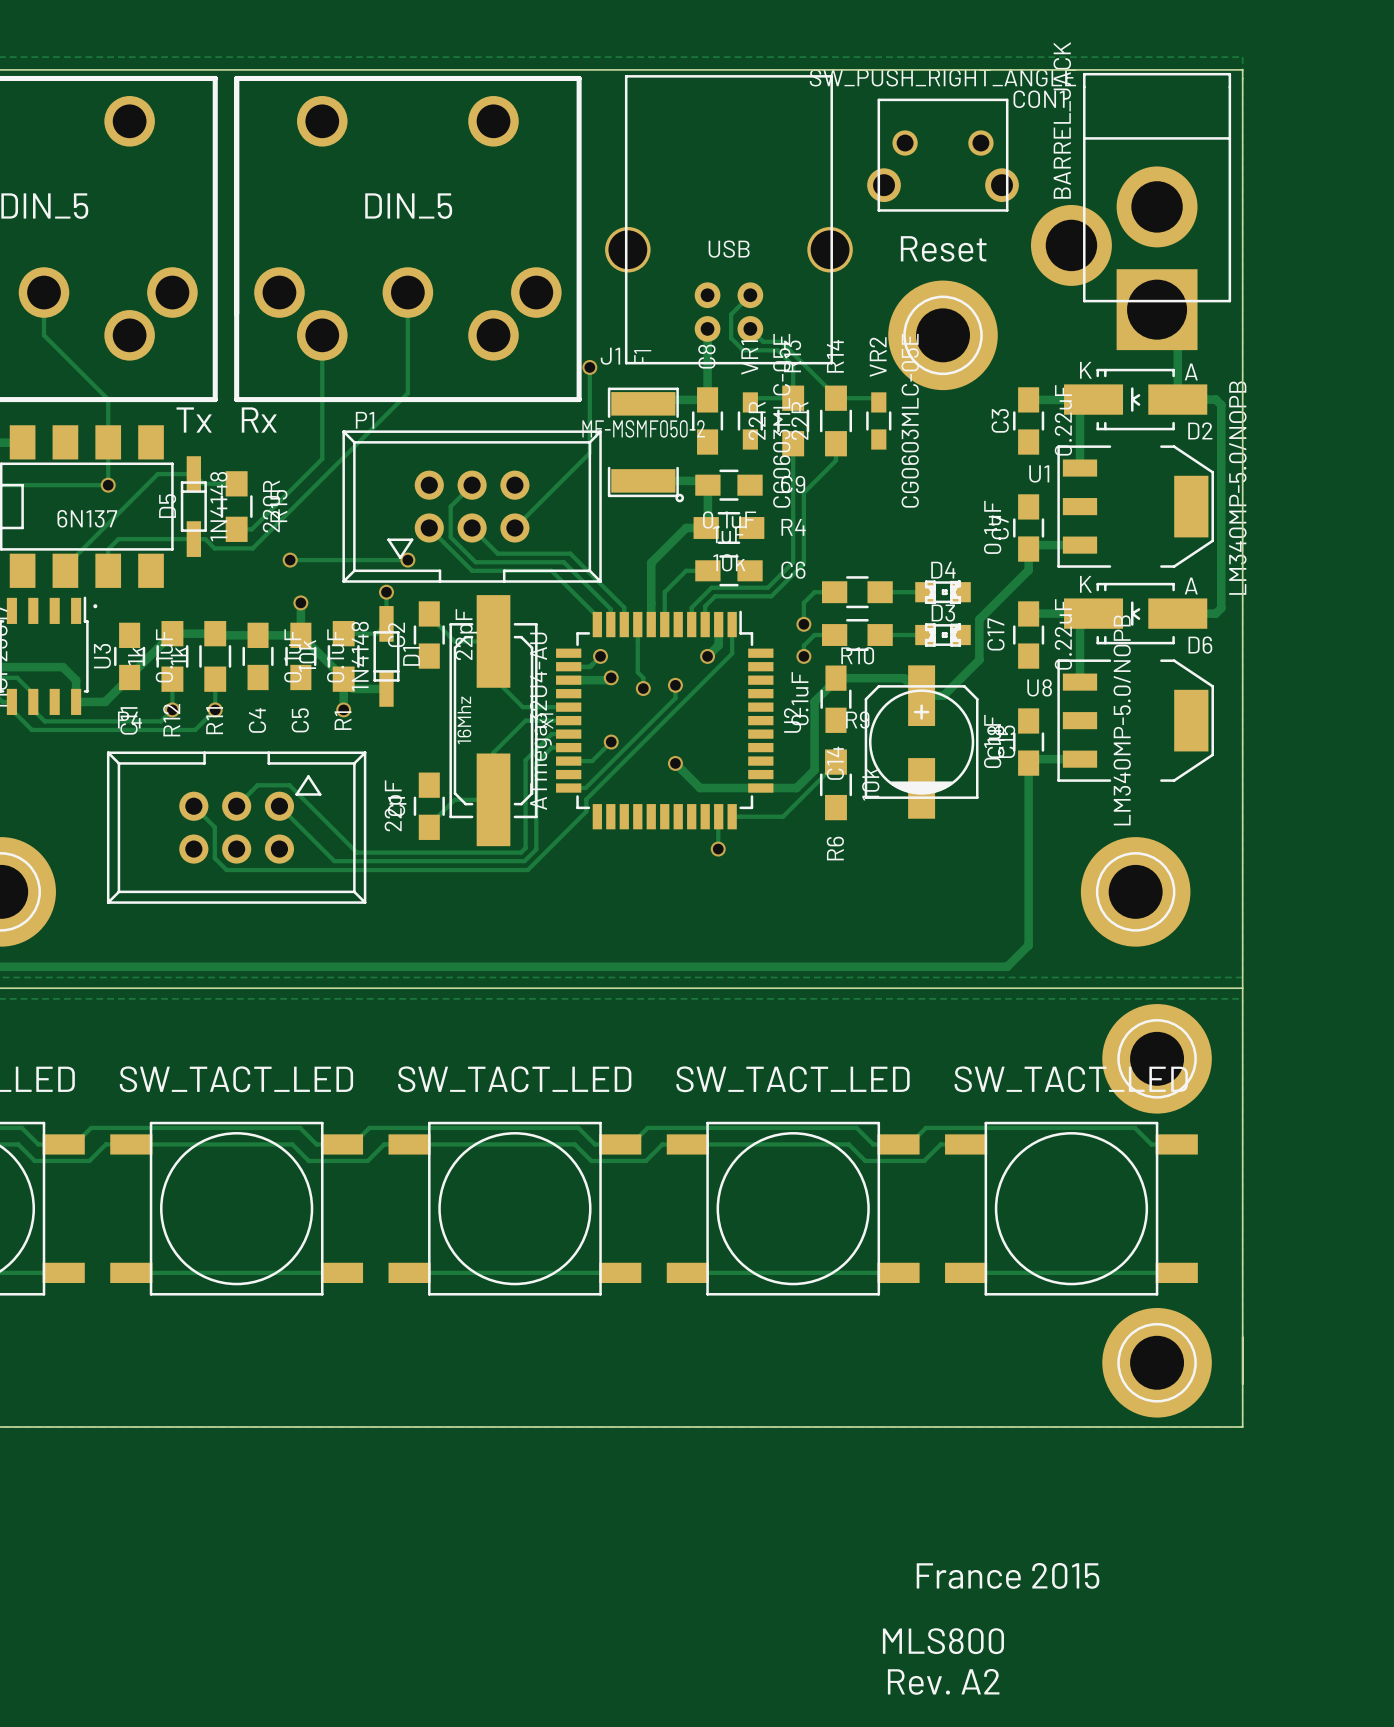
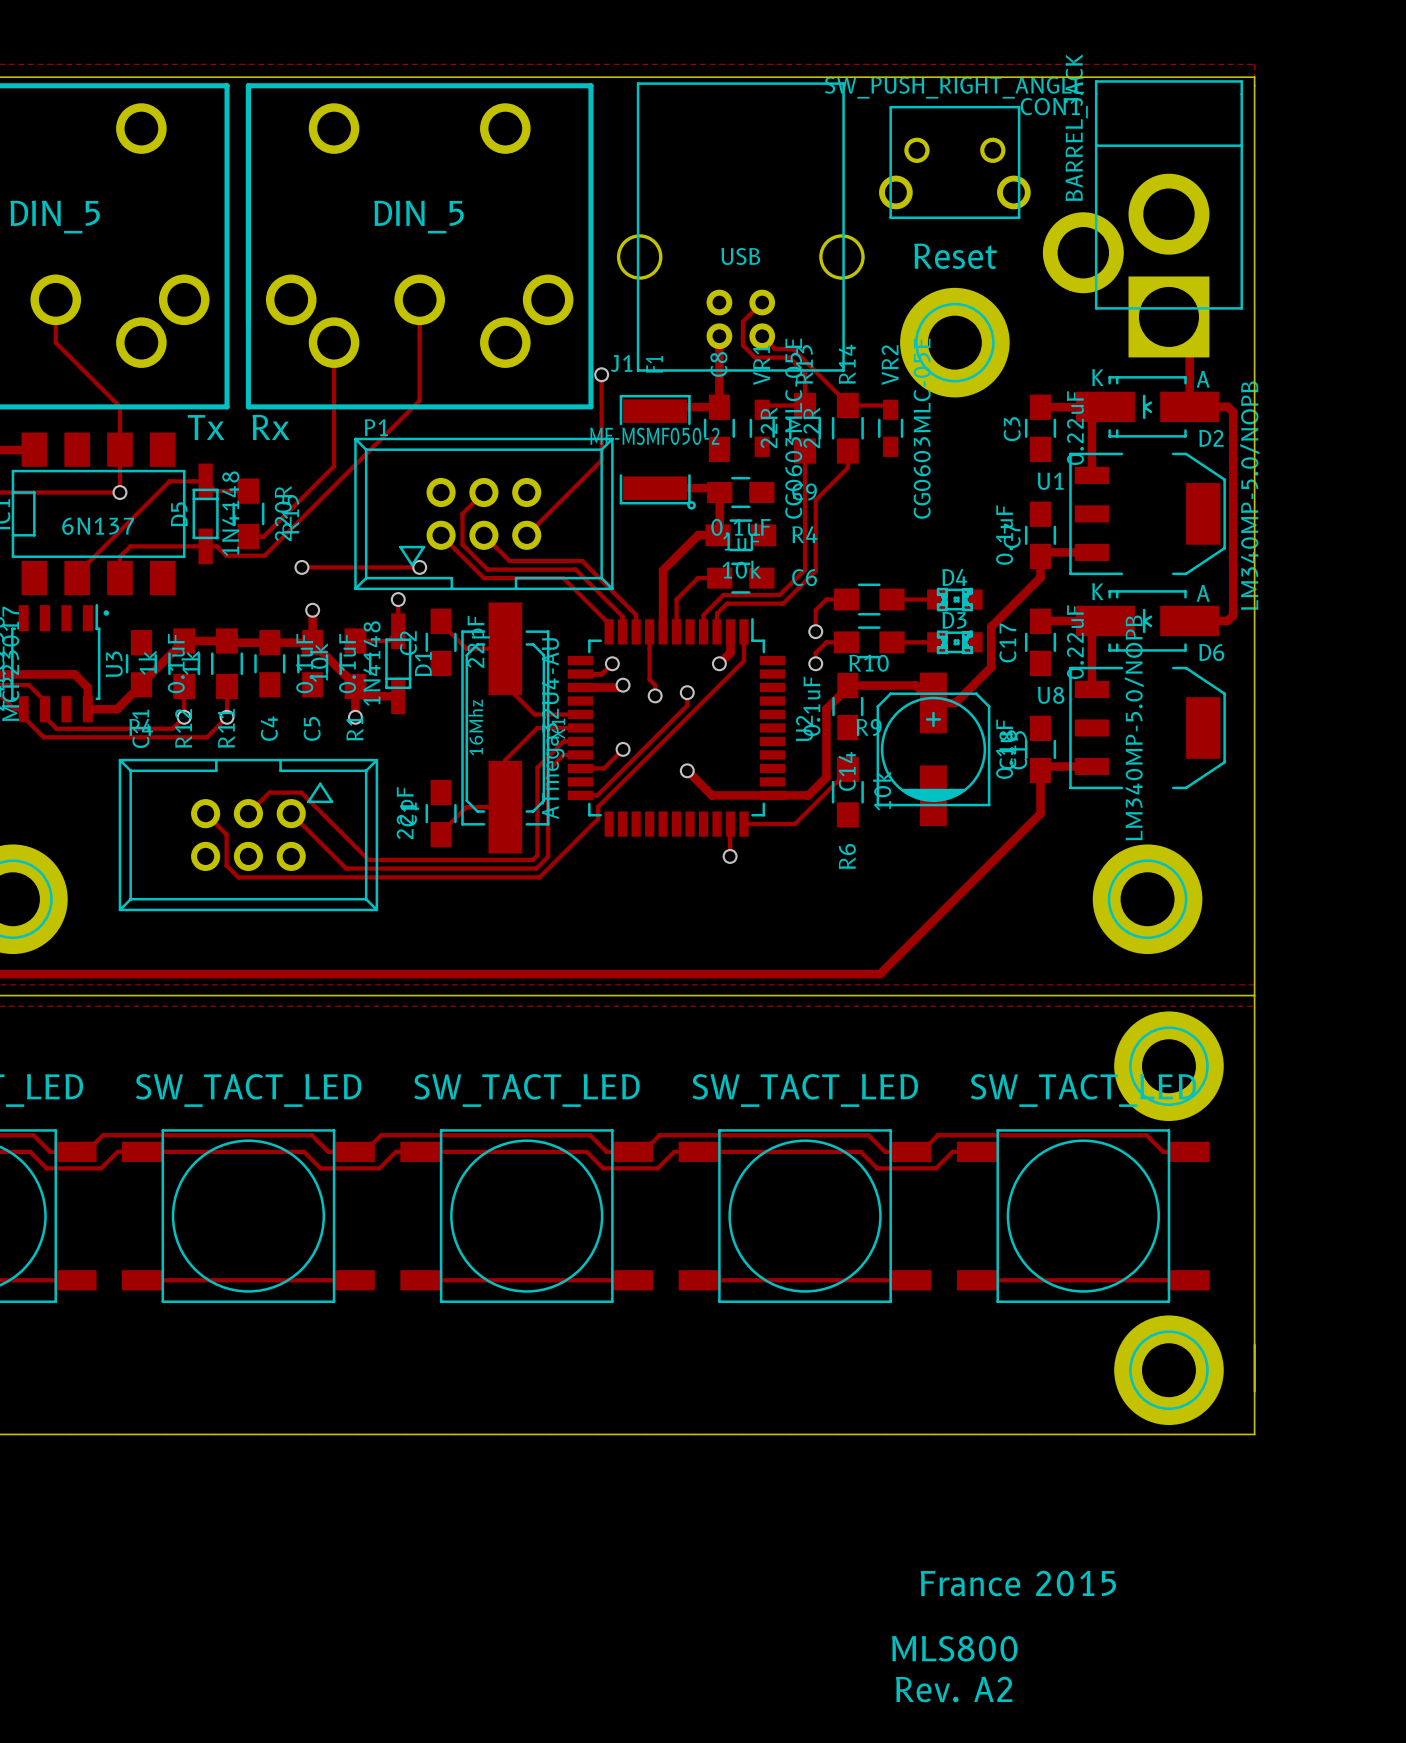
track: (1028, 806) (1028, 945) (1007, 966) (868, 966) -> (1040, 813) (879, 974)

